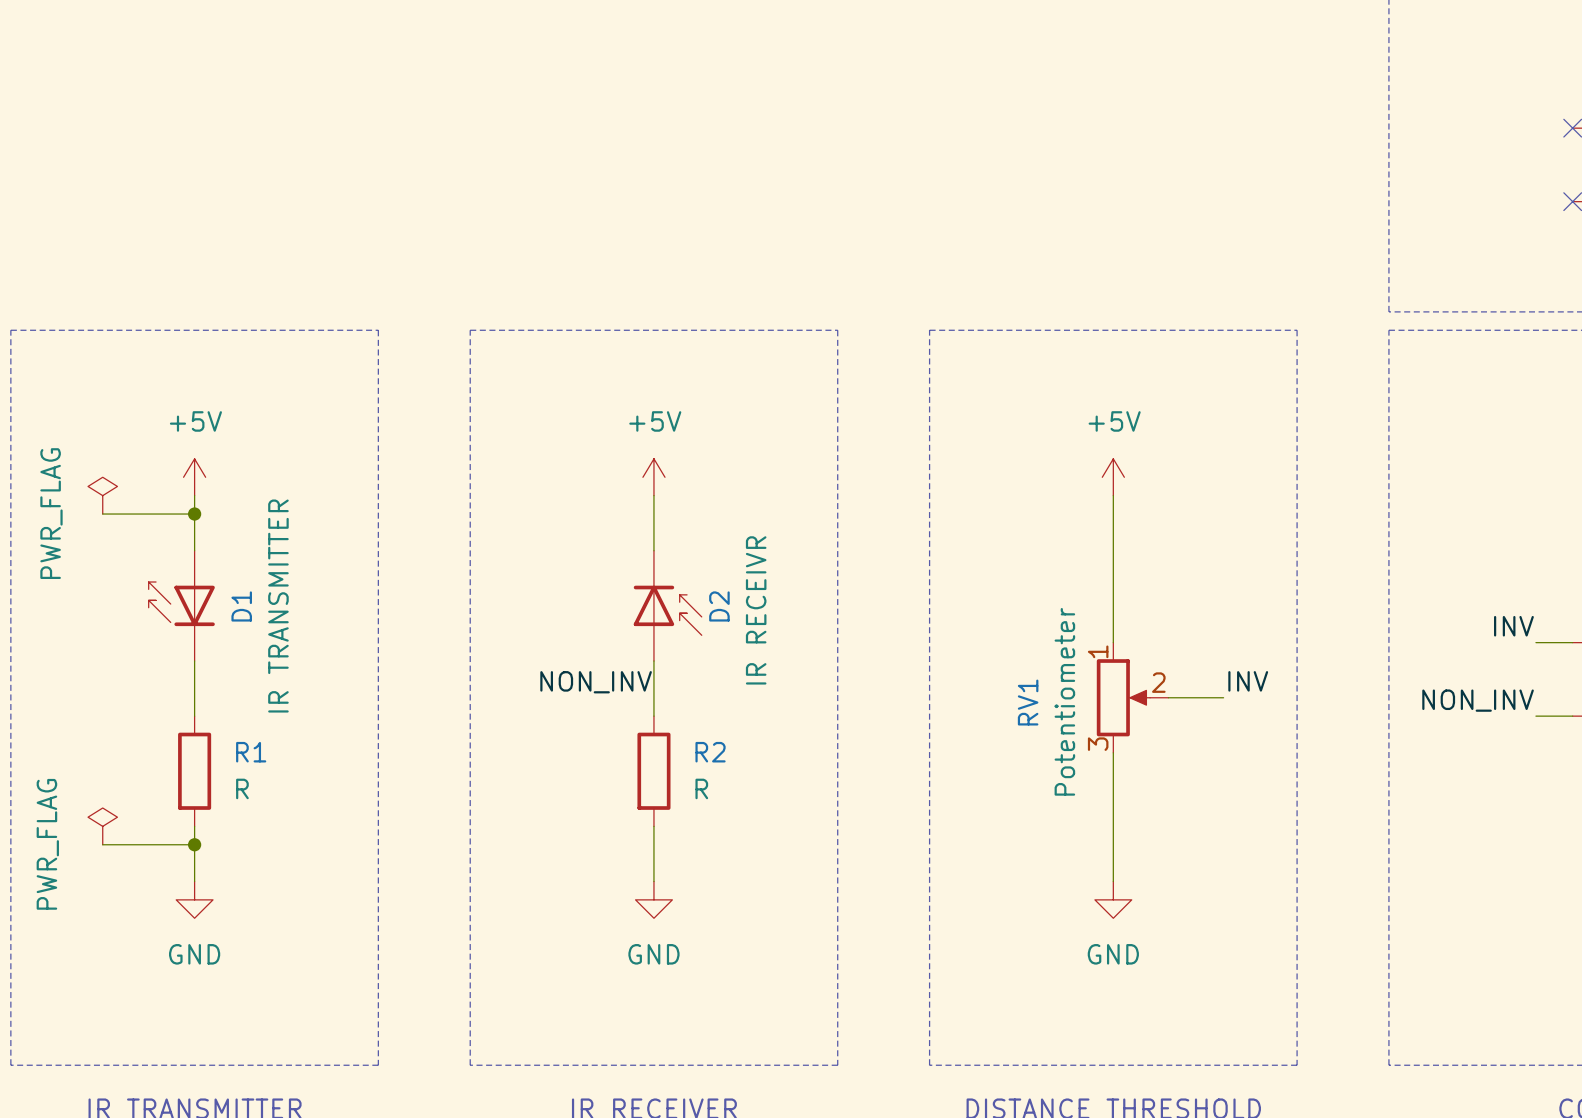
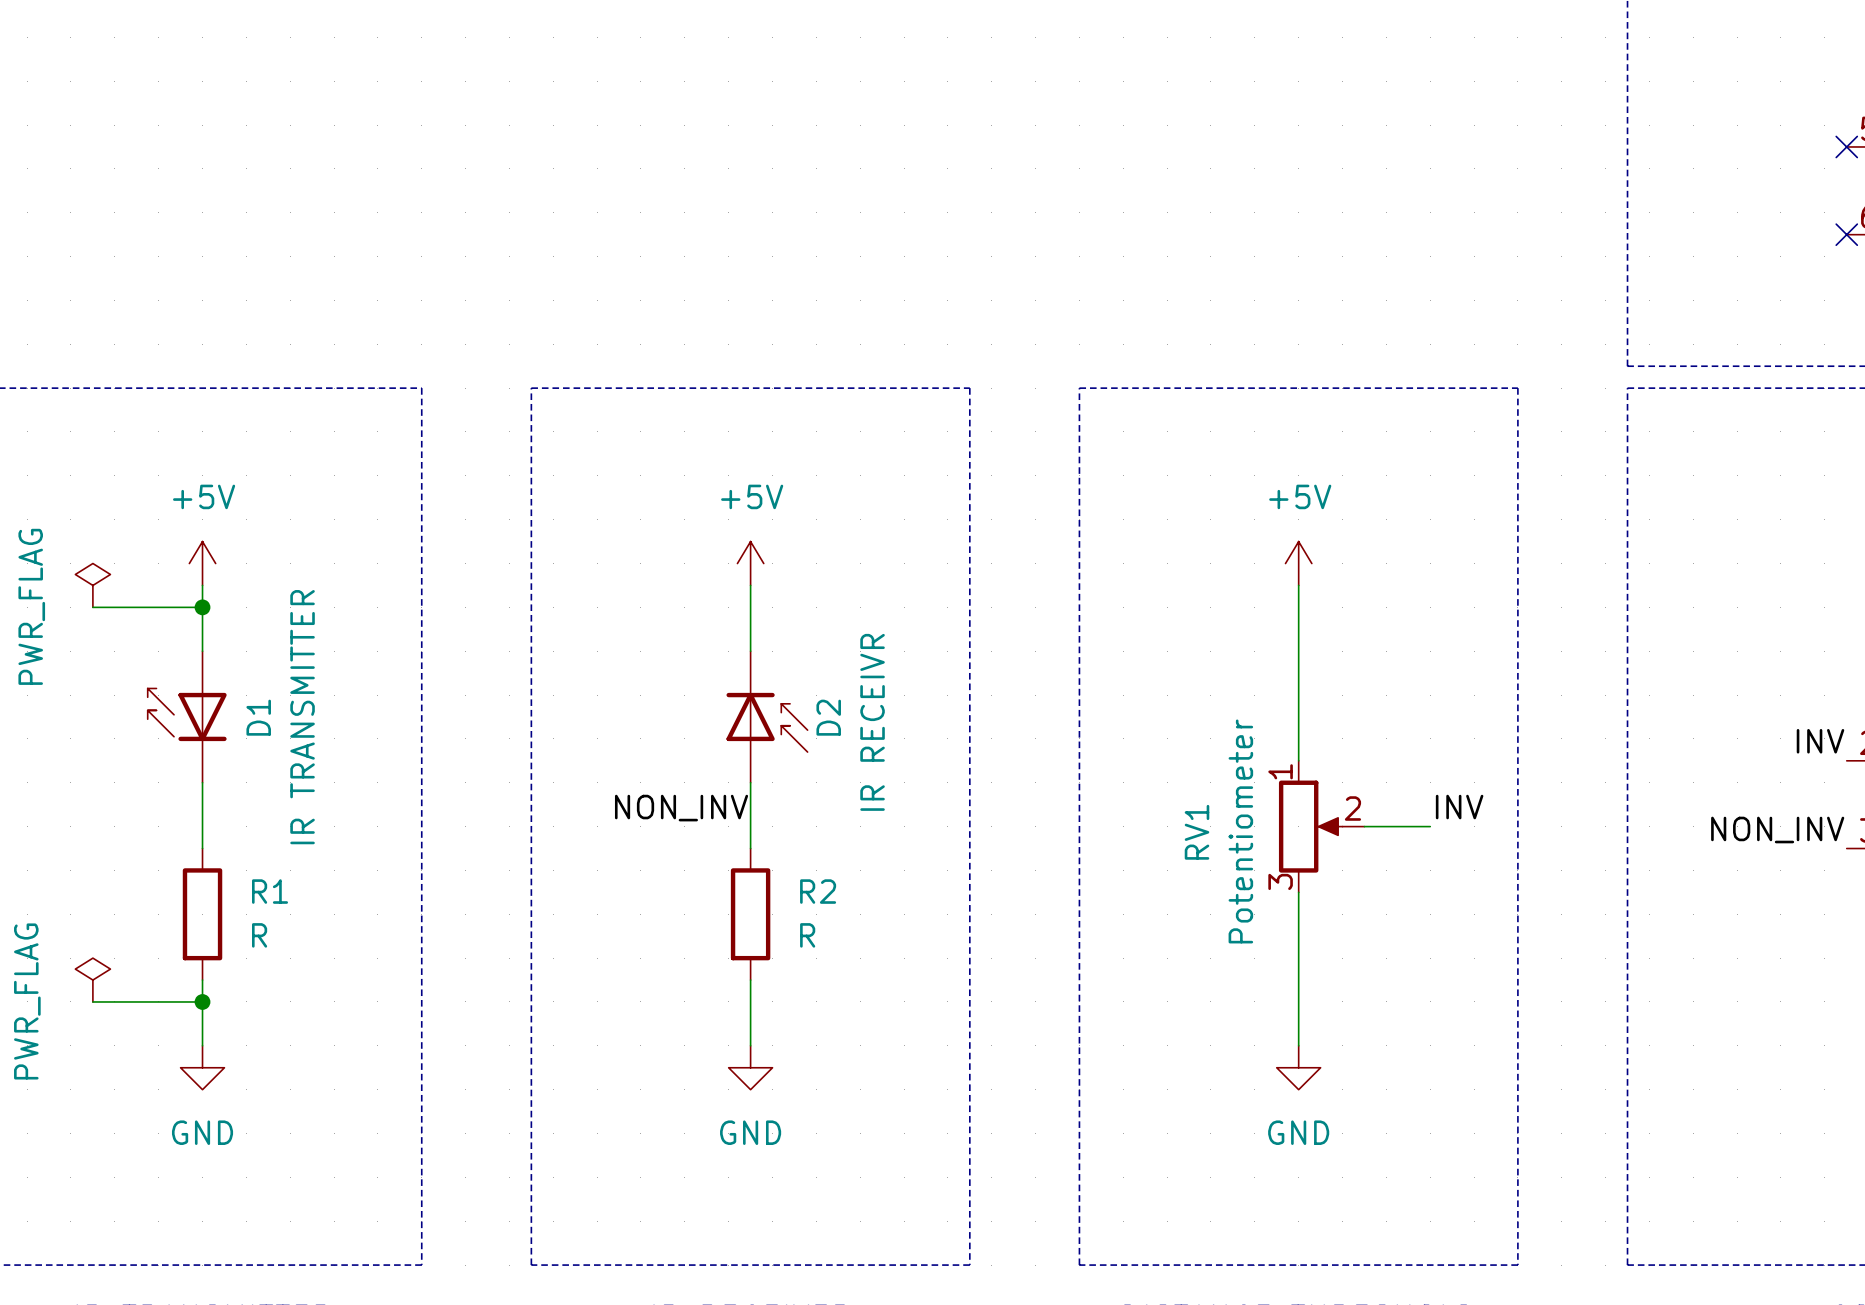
label position: INV (1513, 626) -> INV (1820, 741)
wire: (1535, 642) (1572, 642) -> none
label position: NON_INV (1478, 700) -> NON_INV (1777, 830)
wire: (1535, 716) (1572, 716) -> none

